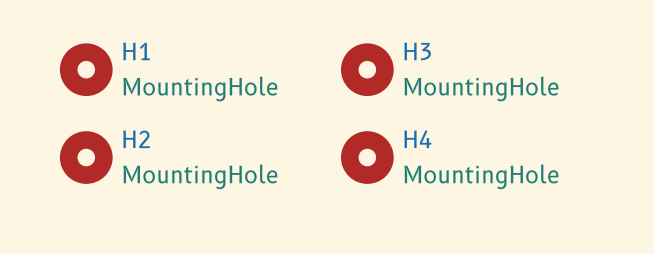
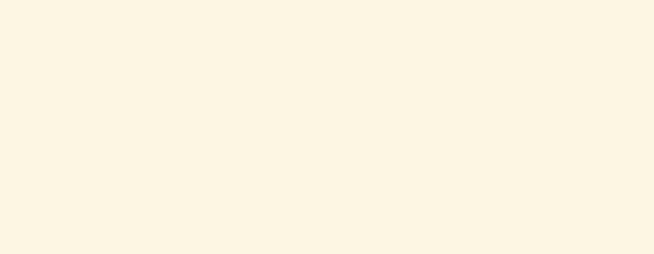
H1: MountingHole (86, 69) -> none
H3: MountingHole (367, 69) -> none
H2: MountingHole (86, 157) -> none
H4: MountingHole (367, 157) -> none

